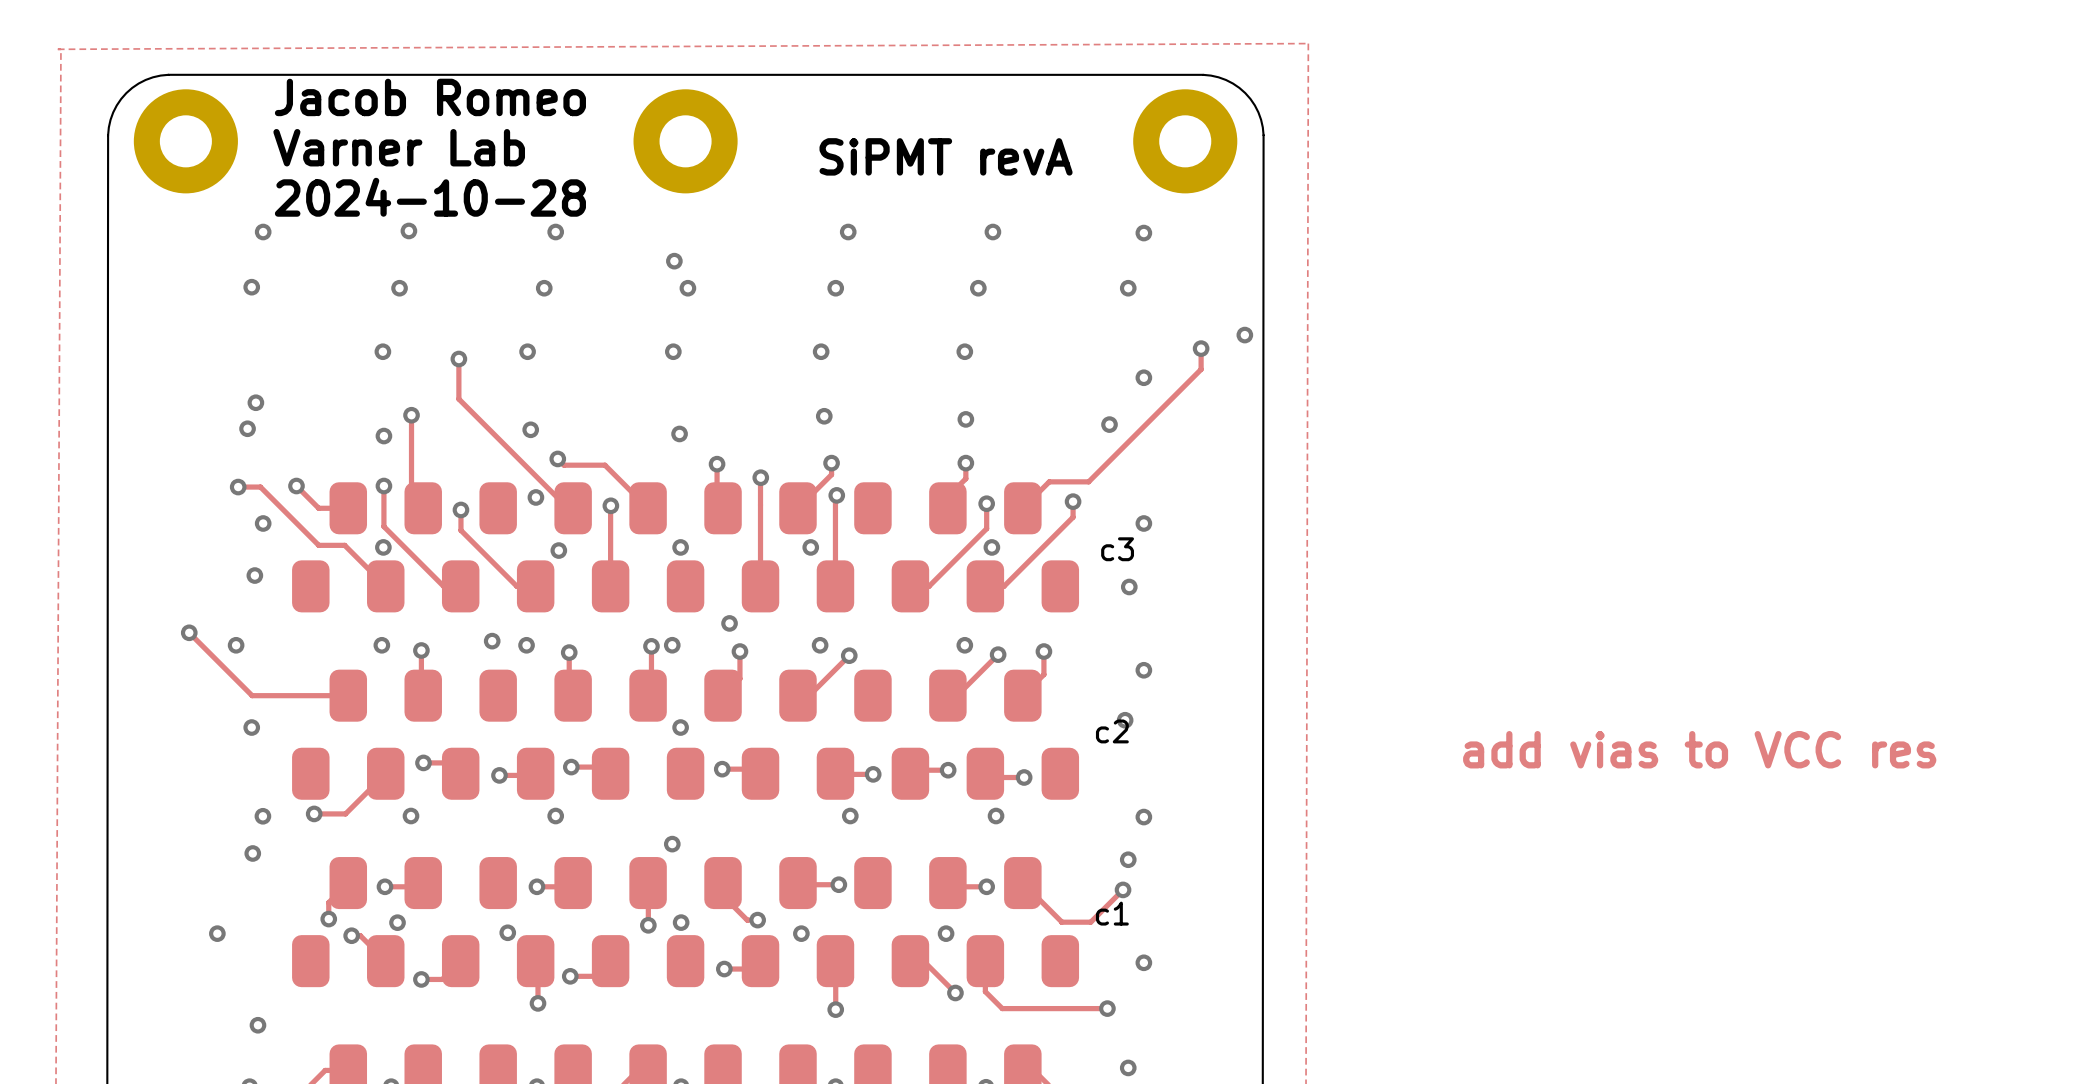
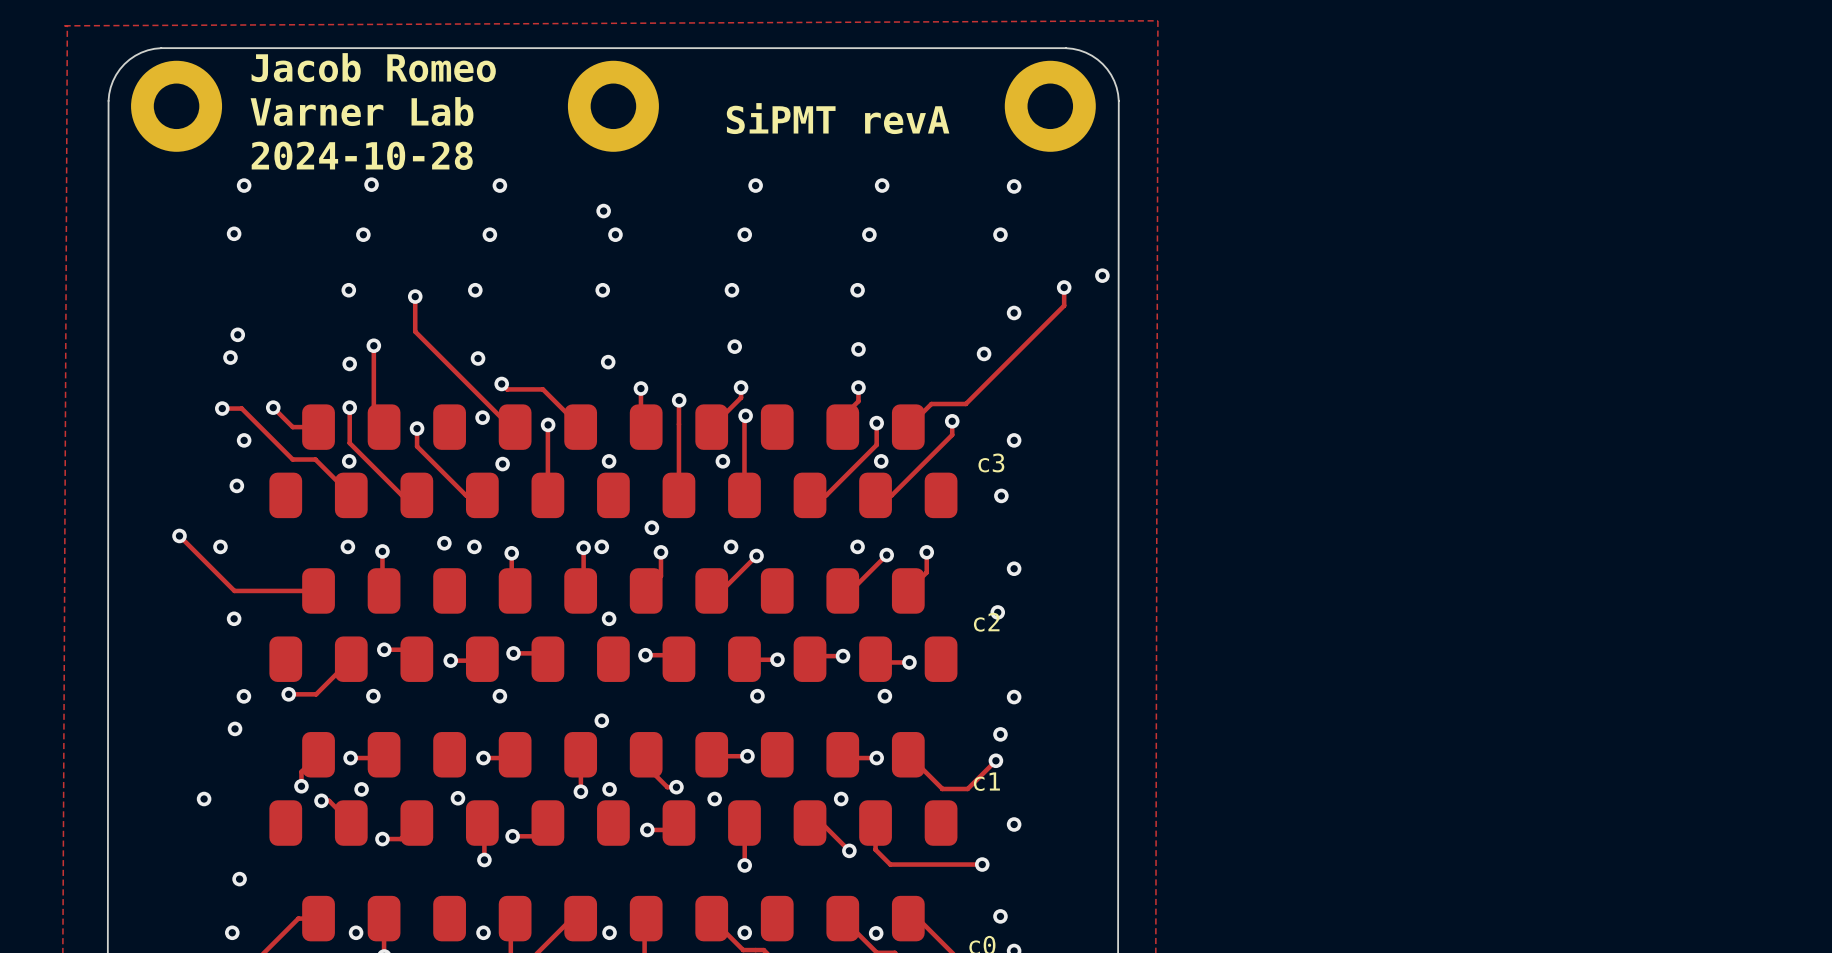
text: add vias to VCC res (1699, 749) -> none

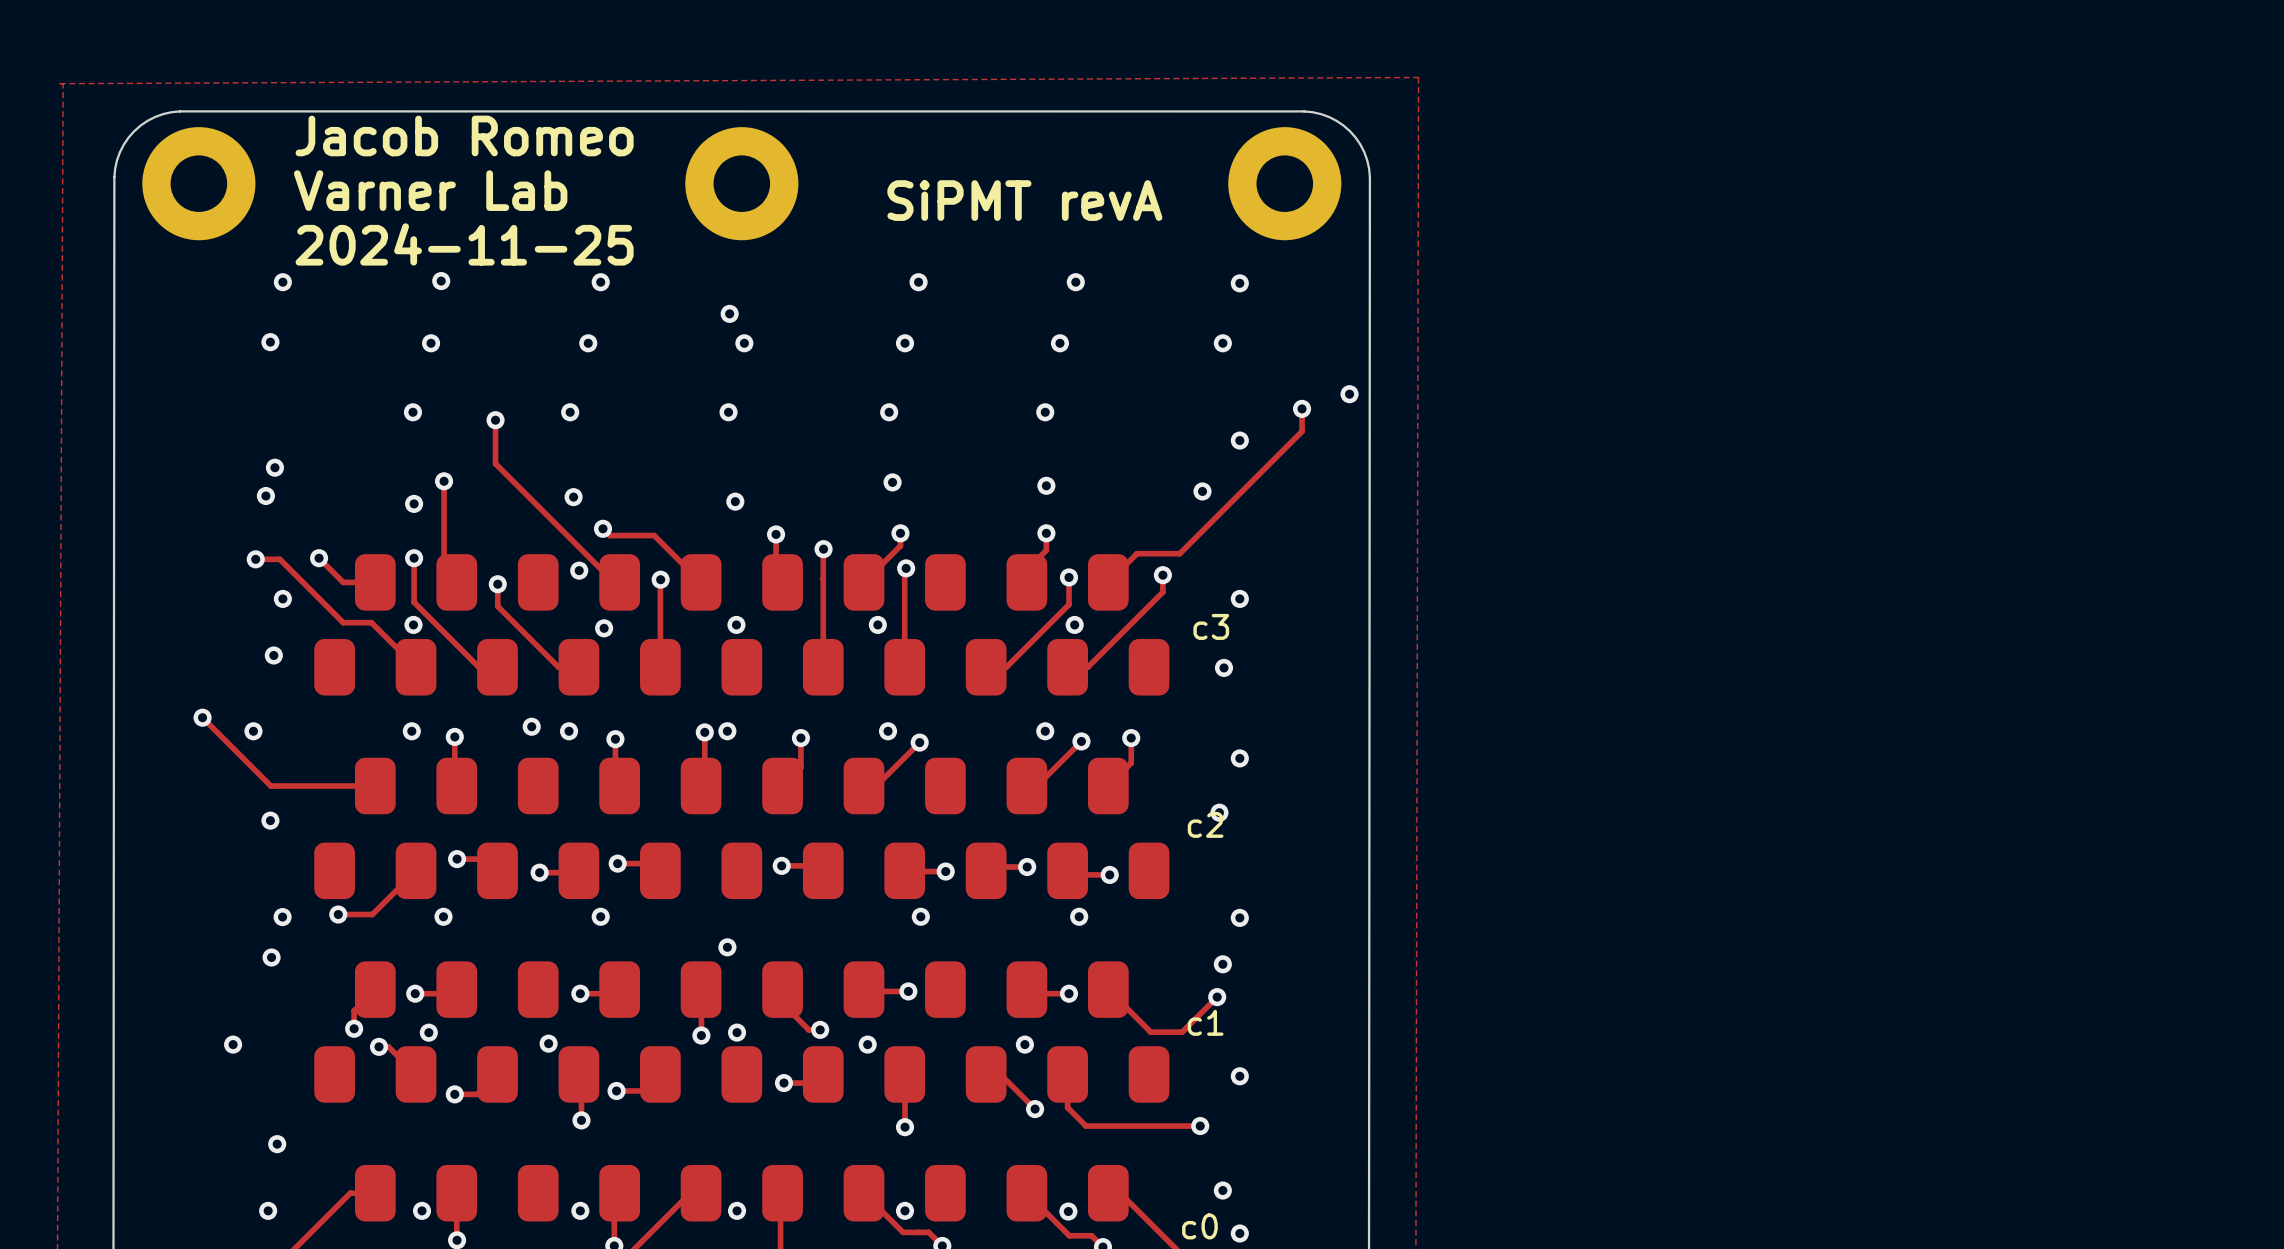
text: 2024-10-28 (362, 155) -> 2024-11-25 (464, 244)
via: (651, 527) -> none
via: (609, 618) -> none

